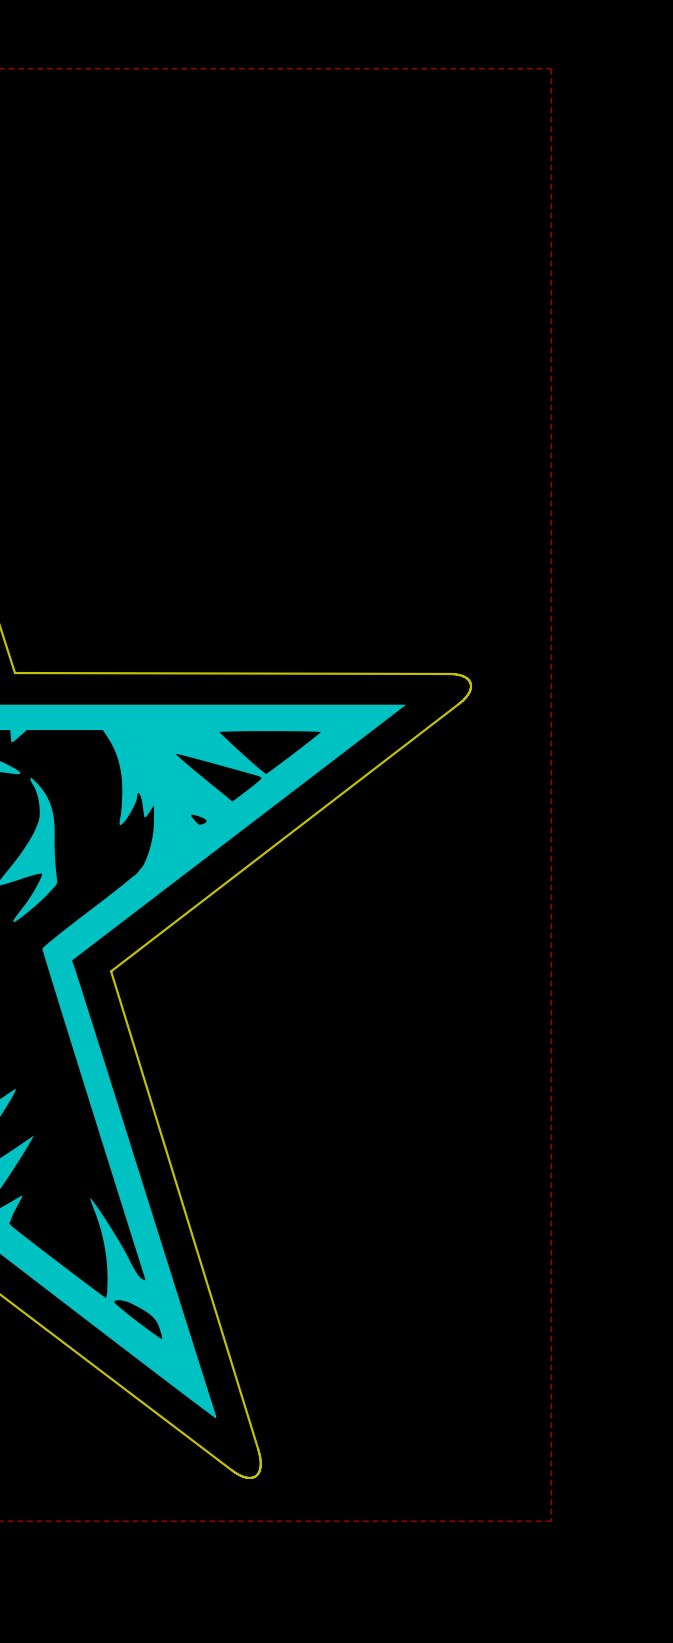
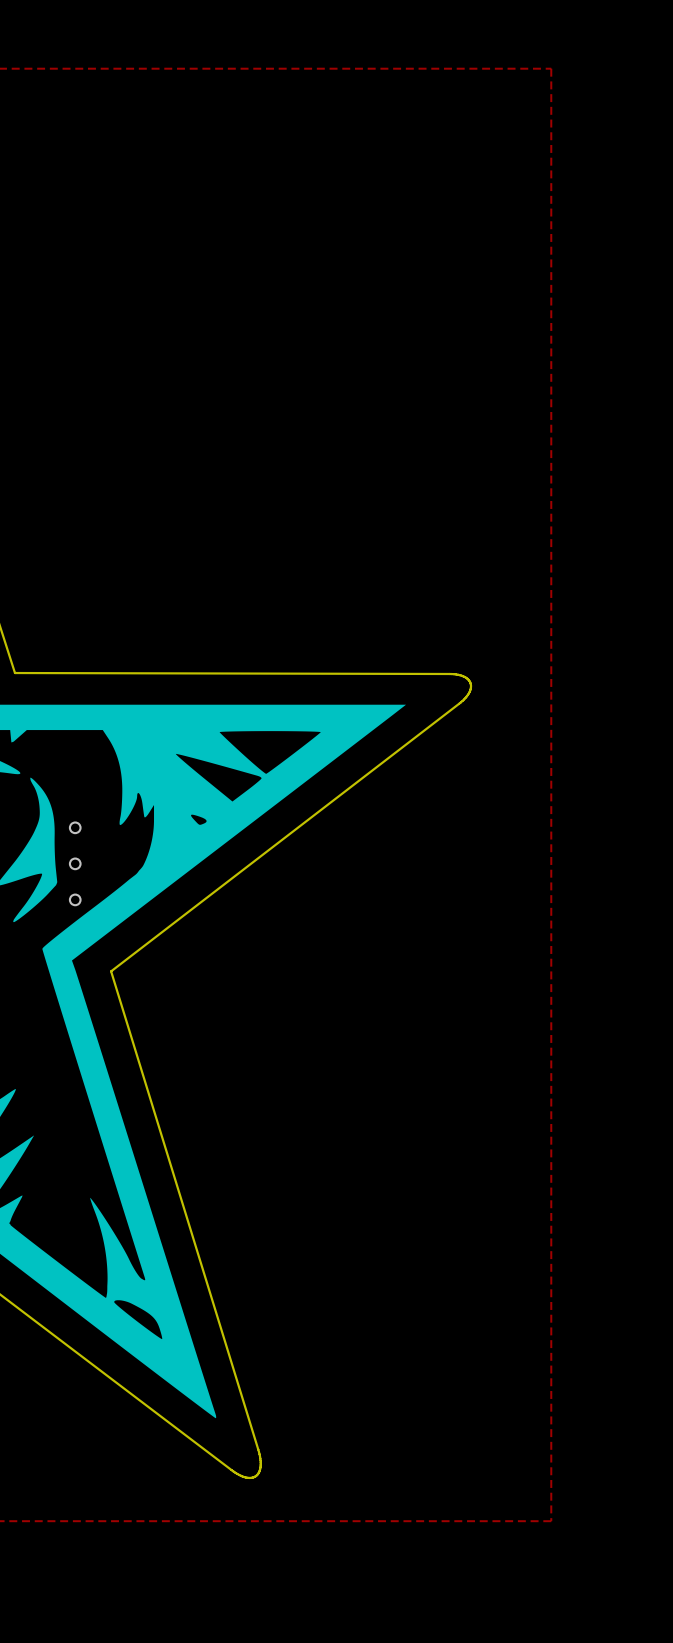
via: none -> (75, 827)
via: none -> (75, 863)
via: none -> (75, 899)

